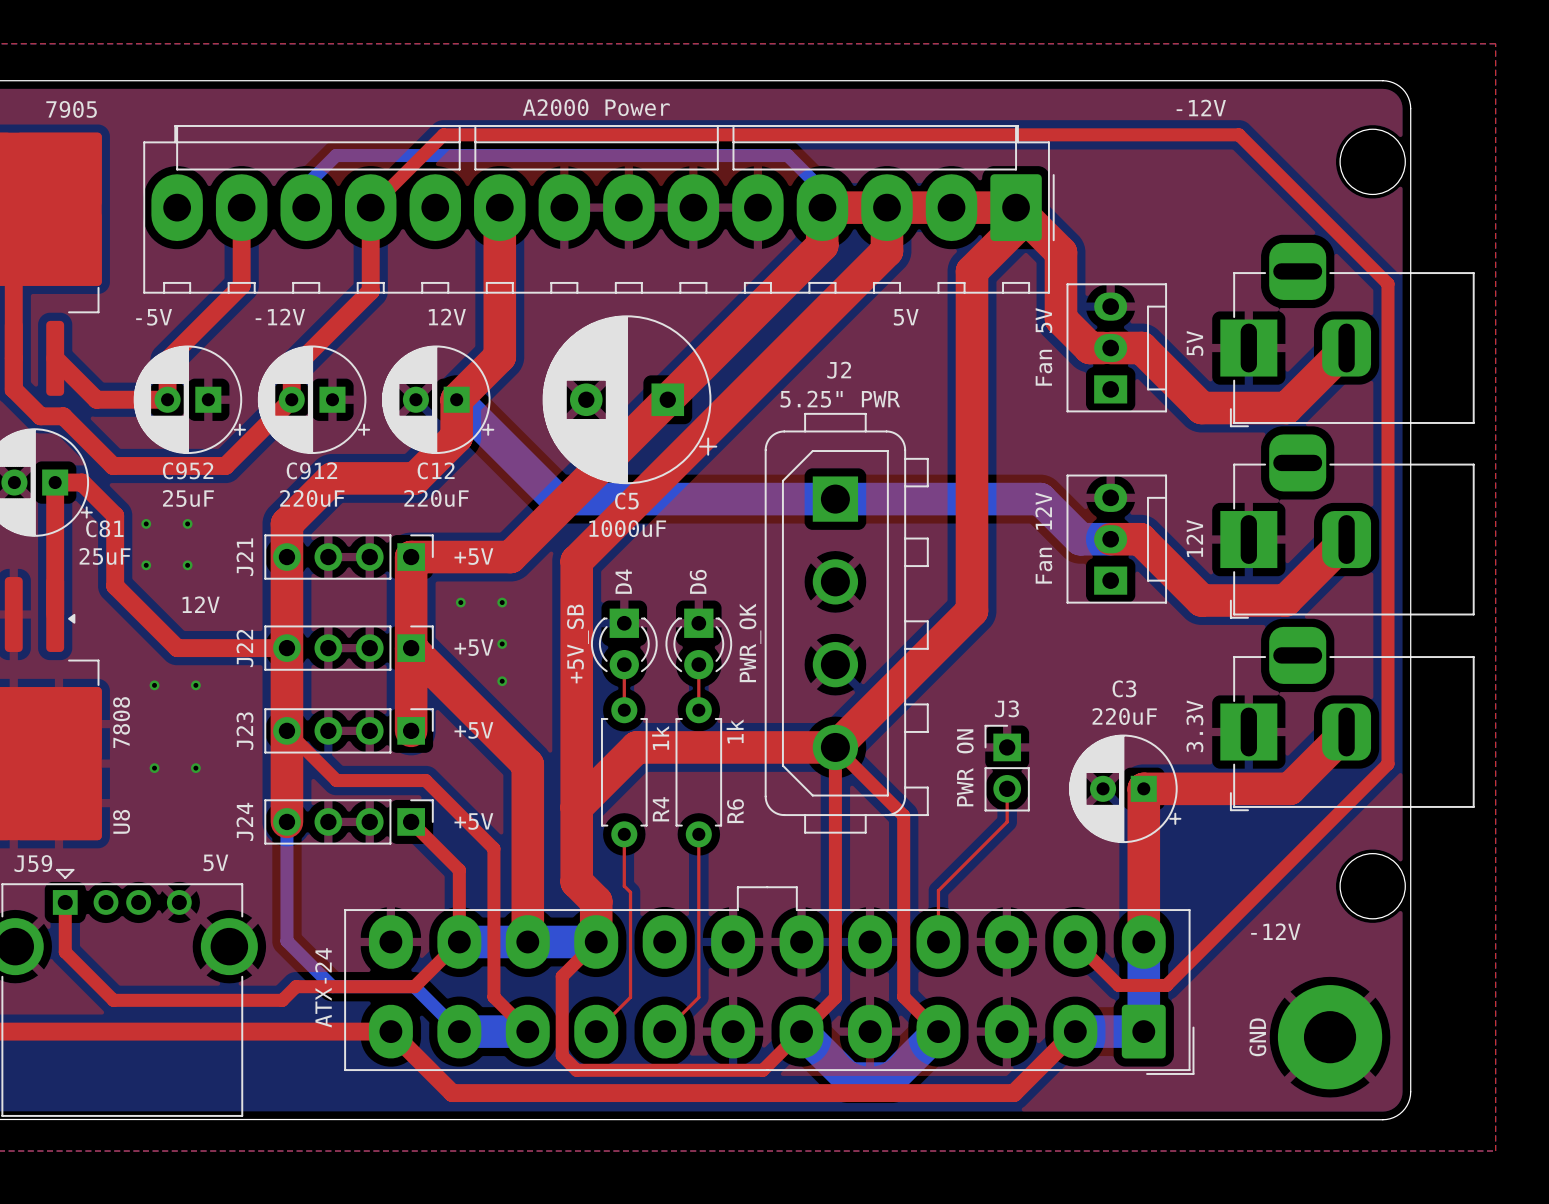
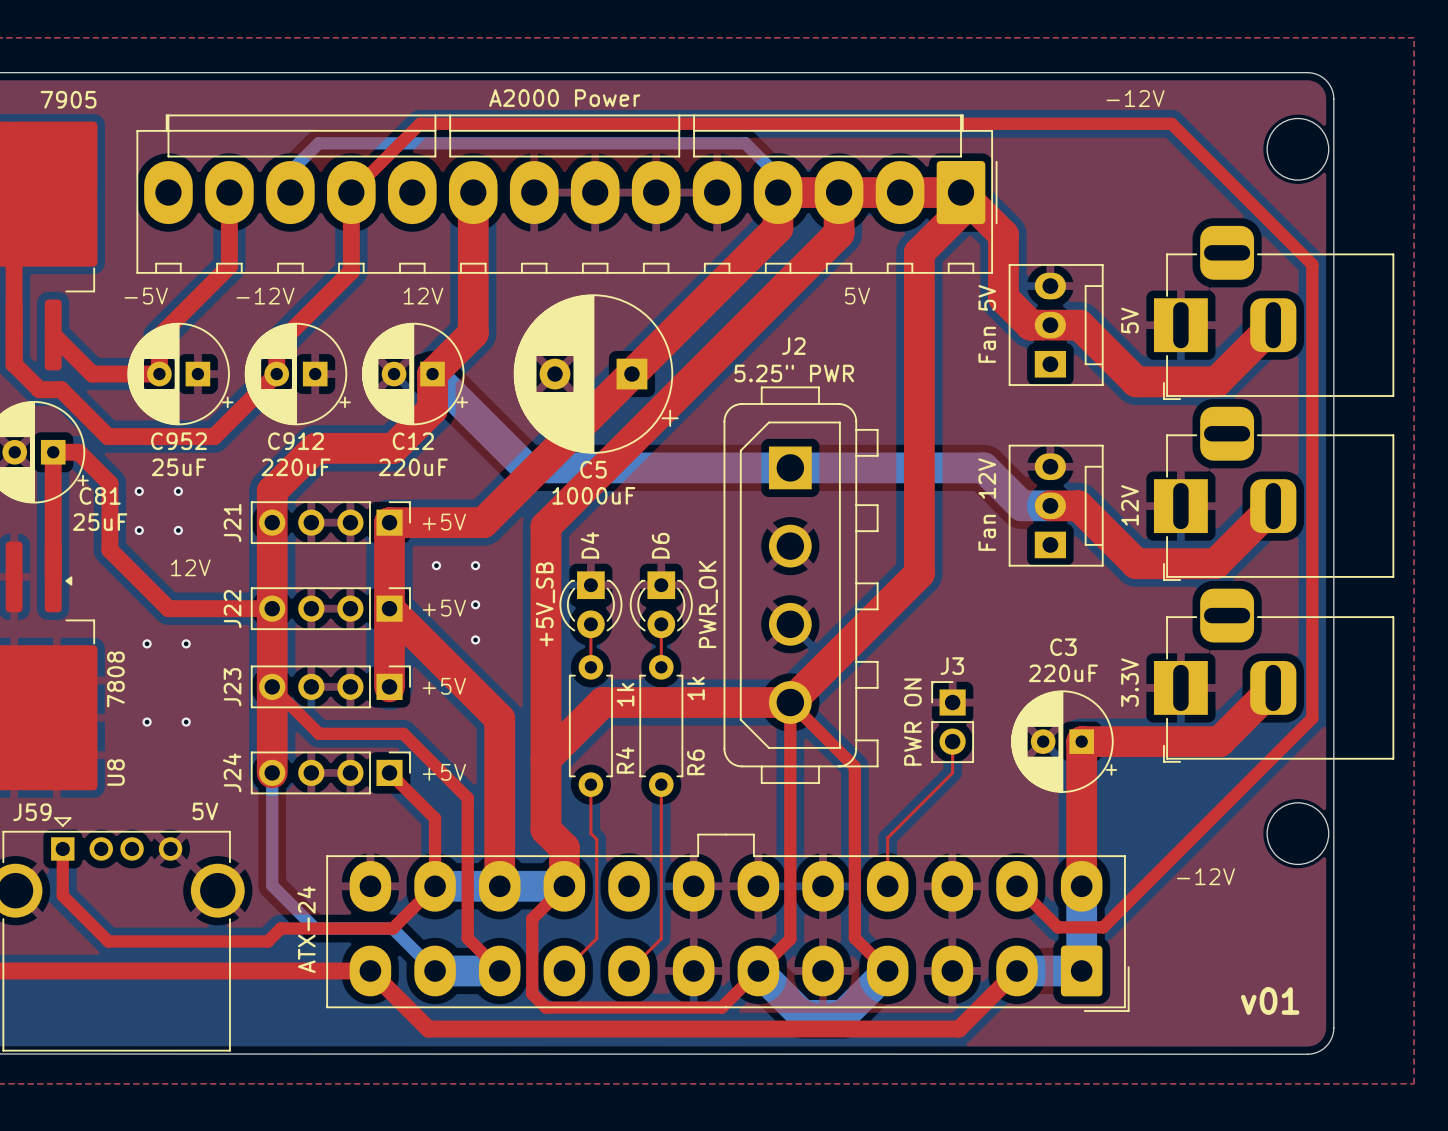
text: GND (1257, 1037) -> none
part: (1330, 1037) -> none
text: none -> v01 (1270, 1000)

